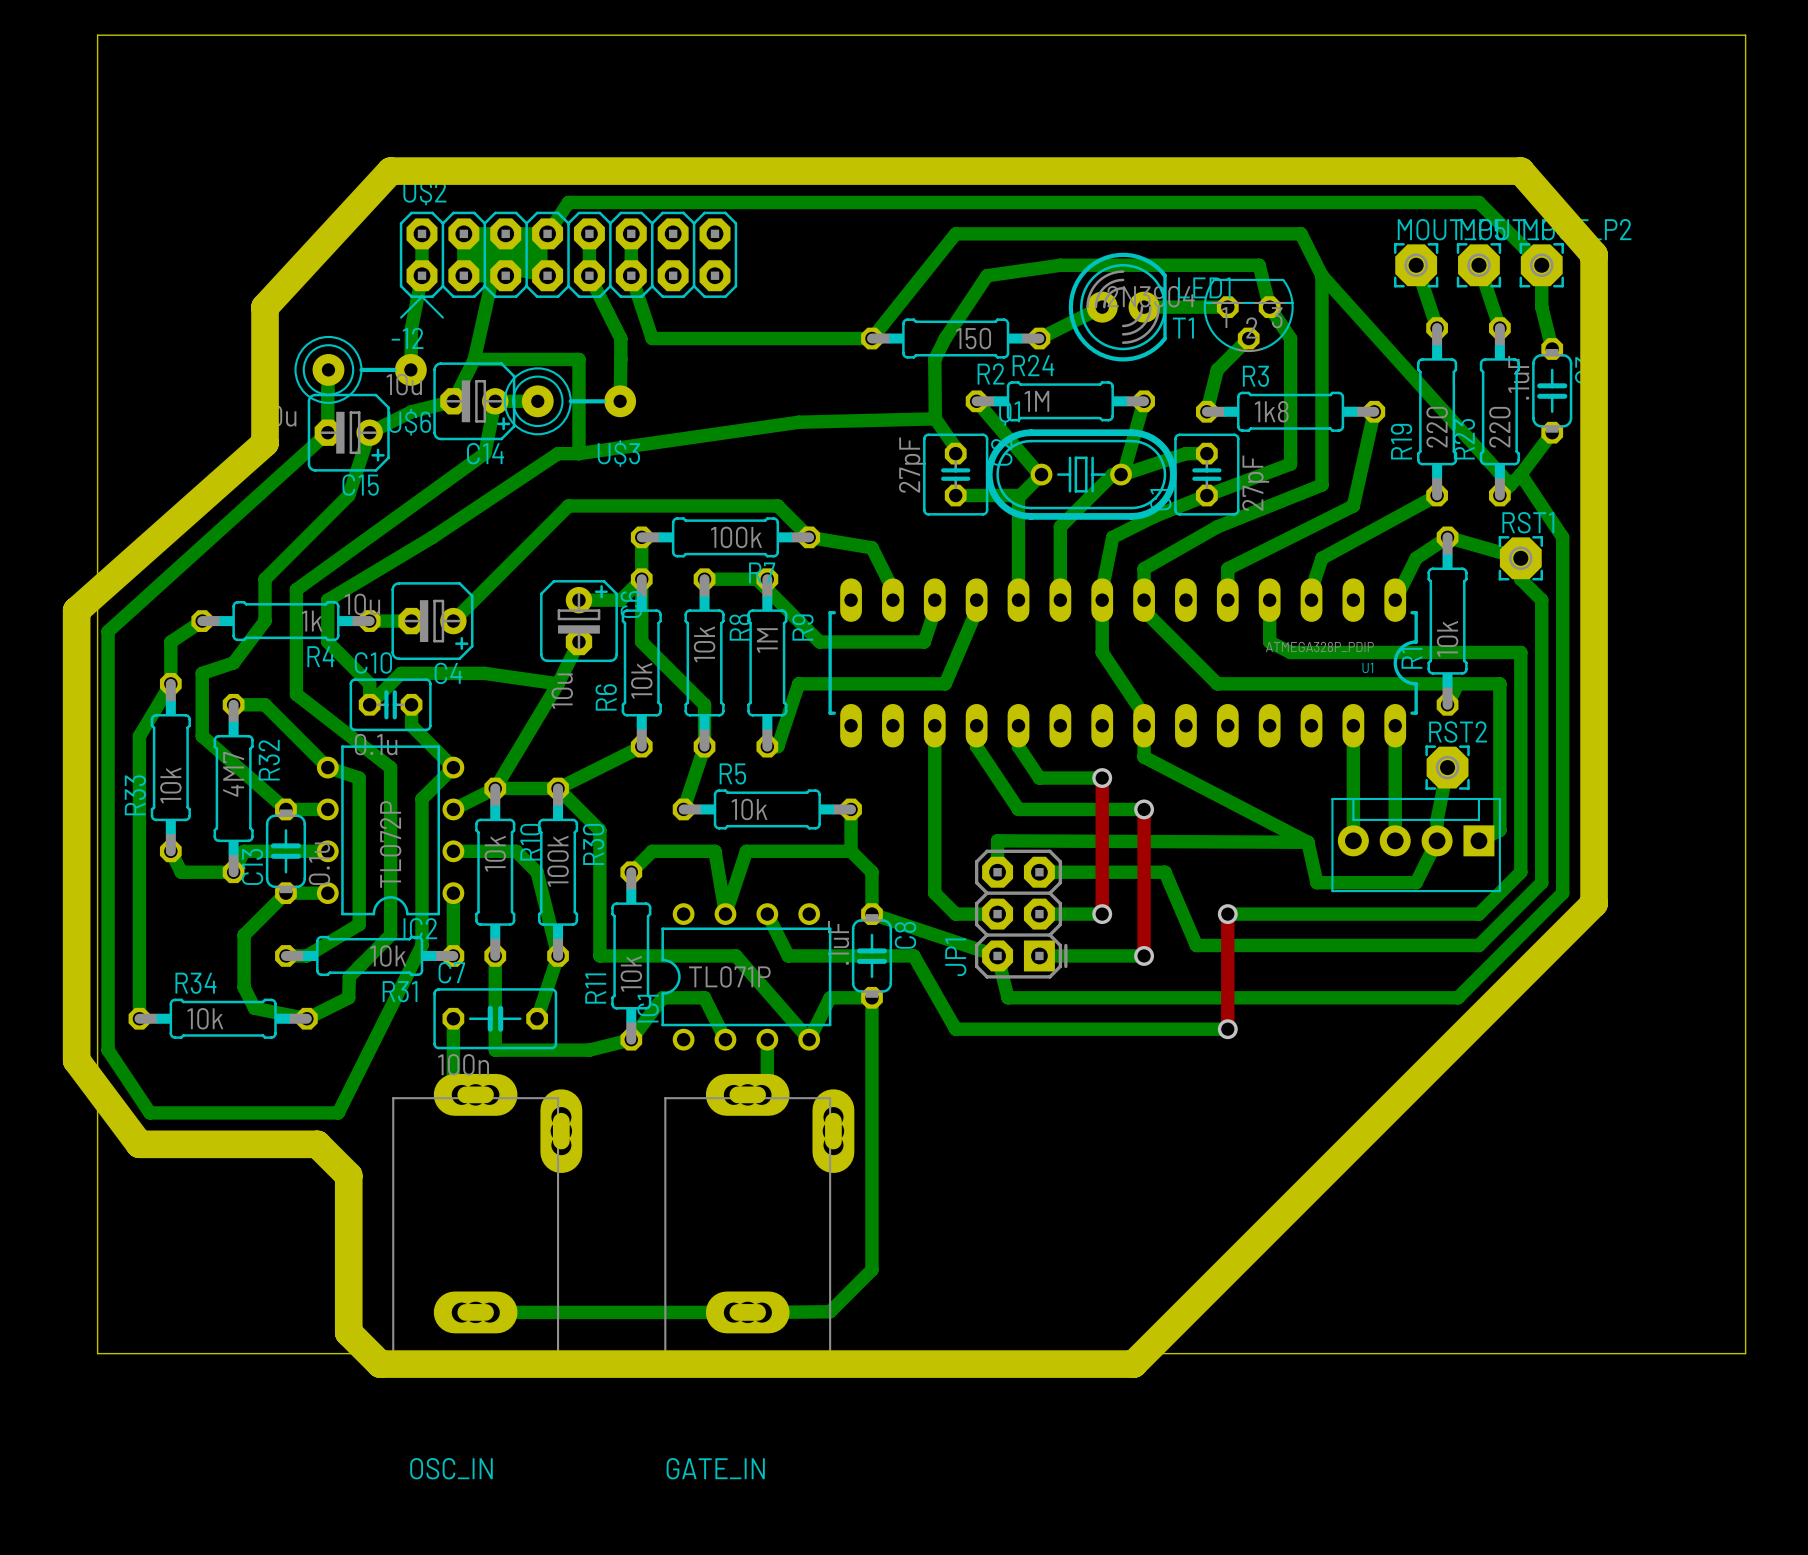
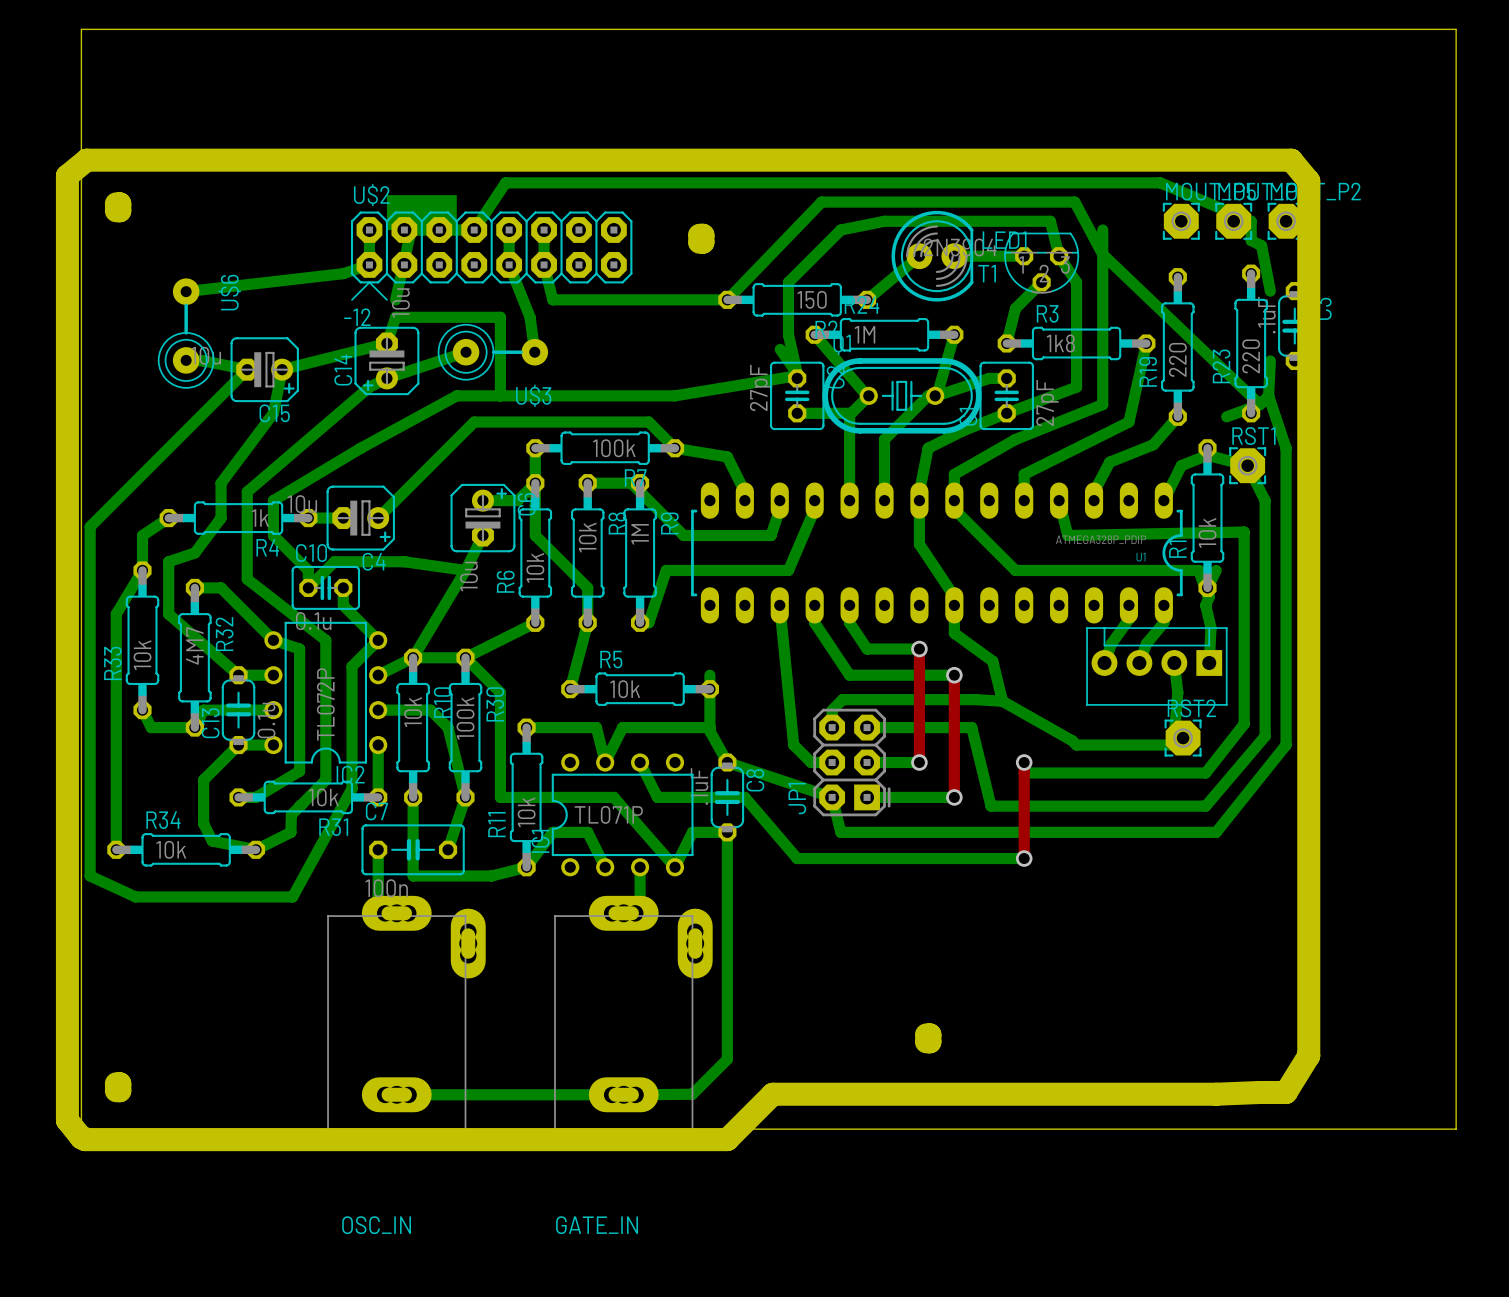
board edge: (390, 171) (1520, 171) (1594, 254) (1594, 903) (1133, 1364) (380, 1364) (348, 1332) (348, 1175) (317, 1144) (139, 1144) (76, 1060) (76, 610) (265, 443) (265, 307) (390, 171) -> (86, 160) (67, 175) (67, 1120) (81, 1137) (84, 1139) (727, 1139) (772, 1094) (1216, 1094) (1286, 1092) (1308, 1055) (1308, 181) (1291, 160) (86, 160)
bottom track: (422, 233) (422, 275) (411, 328) (410, 369) -> none
bottom track: (589, 233) (589, 275) (620, 338) (620, 401) -> none
bottom track: (631, 233) (631, 275) (652, 338) (871, 338) (955, 233) (1301, 233) (1321, 275) (1510, 485) (1499, 495) -> none
board edge: none -> (116, 203) (119, 203) (119, 210) (116, 210)
U$2 position: (568, 265) -> (491, 256)
bottom track: (1060, 265) (987, 275) (945, 338) (934, 359) (935, 418) (798, 422) (578, 453) -> (884, 221) (840, 230) (788, 282) (788, 334) (797, 375) (675, 395) (456, 395) (360, 448)
bottom track: (1416, 265) (1437, 328) -> none
bottom track: (1478, 265) (1499, 328) -> none
bottom track: none -> (369, 230) (369, 264) (343, 273) (186, 291)
bottom track: (484, 275) (463, 275) (463, 233) (547, 233) (568, 202) (1478, 202) (1541, 265) (1541, 307) (1552, 348) -> none
bottom track: none -> (421, 230) (474, 230) (505, 182) (1160, 182) (1251, 221) (1251, 240) (1261, 245) (1270, 291)
bottom track: none -> (509, 230) (509, 264) (530, 317) (534, 352)
bottom track: none -> (544, 230) (544, 264) (552, 299) (727, 299) (821, 202) (1074, 202) (1102, 254) (1259, 404) (1226, 416)
board edge: none -> (699, 235) (702, 235) (702, 242) (699, 242)
bottom track: (1102, 307) (1039, 338) -> (919, 256) (867, 299)
R2 position: (955, 338) -> (797, 299)
bottom track: (328, 369) (327, 432) (108, 631) -> (186, 360) (203, 360) (247, 369) (90, 526)
U$6 rotation: 0° (360, 369) -> 90° counterclockwise (186, 333)
U$6 position: (360, 369) -> (186, 333)
C14 rotation: 0° (474, 401) -> 90° clockwise (386, 360)
bottom track: (537, 401) (495, 401) (484, 453) (296, 589) -> (466, 352) (386, 378) (369, 387) (247, 491)
U$3 position: (569, 401) -> (492, 352)
R19 position: (1437, 411) -> (1177, 346)
C15 position: (348, 432) -> (264, 369)
bottom track: (1552, 432) (1520, 474) (1562, 537) (1562, 893) (1458, 997) -> none
bottom track: (578, 453) (578, 359) (474, 359) (453, 401) (411, 411) (369, 432) (348, 495) (265, 579) -> (500, 395) (500, 317) (395, 317) (386, 343) (282, 369) (273, 413) (221, 483)
bottom track: (578, 453) (558, 453) (432, 537) -> none
bottom track: (1437, 495) (1321, 558) (1311, 589) -> (1177, 416) (1153, 444) (1109, 462) (1094, 491)
bottom track: (1416, 558) (1447, 537) (1520, 558) (1520, 579) (1541, 600) -> (1270, 360) (1268, 395) (1286, 448) (1286, 500)
bottom track: none -> (1181, 465) (1207, 455) (1247, 465) (1265, 500) (1265, 736) (1205, 806) (991, 806) (971, 727)
RST1 position: (1520, 558) -> (1247, 465)
bottom track: (1269, 600) (1269, 642) (1290, 652) (1520, 652) (1520, 872) (1478, 914) (1227, 914) -> (1059, 500) (1067, 535) (1244, 532) (1244, 724) (1205, 772) (1024, 772)
bottom track: (1437, 683) (1499, 683) (1499, 830) (1478, 840) -> (1198, 570) (1209, 596) (1205, 605) (1211, 628) (1209, 662)
bottom track: (934, 725) (934, 893) (955, 914) (972, 914) -> (779, 605) (793, 745) (811, 762)
bottom track: (1353, 742) (1353, 840) -> (1128, 619) (1111, 643) (1104, 662)
bottom track: (704, 746) (683, 809) -> (587, 622) (570, 689)
bottom track: (1395, 746) (1395, 840) -> (1163, 622) (1146, 643) (1139, 662)
bottom track: (1144, 757) (1307, 842) -> (954, 631) (992, 661) (1002, 701)
bottom track: (1447, 767) (1437, 819) (1437, 840) (1416, 882) (1316, 882) (1307, 842) -> none
RST2 position: (1447, 767) -> (1183, 738)
bottom track: none -> (1174, 662) (1177, 692) (1174, 734) (1183, 738) (1176, 745) (1076, 745) (1002, 701)
R5 position: (767, 809) -> (640, 689)
bottom track: (1307, 842) (997, 840) (997, 851) -> (1002, 701) (842, 699) (832, 710)
part position: (1416, 845) -> (1156, 666)
bottom track: none -> (709, 710) (709, 731) (727, 762)
bottom track: (631, 872) (652, 851) (715, 851) (725, 914) (746, 851) (851, 851) (871, 872) (871, 914) -> (526, 727) (596, 727) (605, 762) (622, 727) (709, 727)
bottom track: (1165, 872) (1196, 945) (1478, 945) (1541, 882) -> (1216, 832) (1286, 745) (1286, 736)
bottom track: (422, 945) (338, 1112) (149, 1112) (108, 1050) -> (352, 788) (292, 896) (135, 896) (90, 875)
bottom track: (892, 955) (913, 955) (955, 1029) -> (744, 797) (797, 858)
board edge: none -> (926, 1034) (929, 1034) (929, 1041) (926, 1041)
board edge: none -> (116, 1083) (119, 1083) (119, 1090) (116, 1090)

